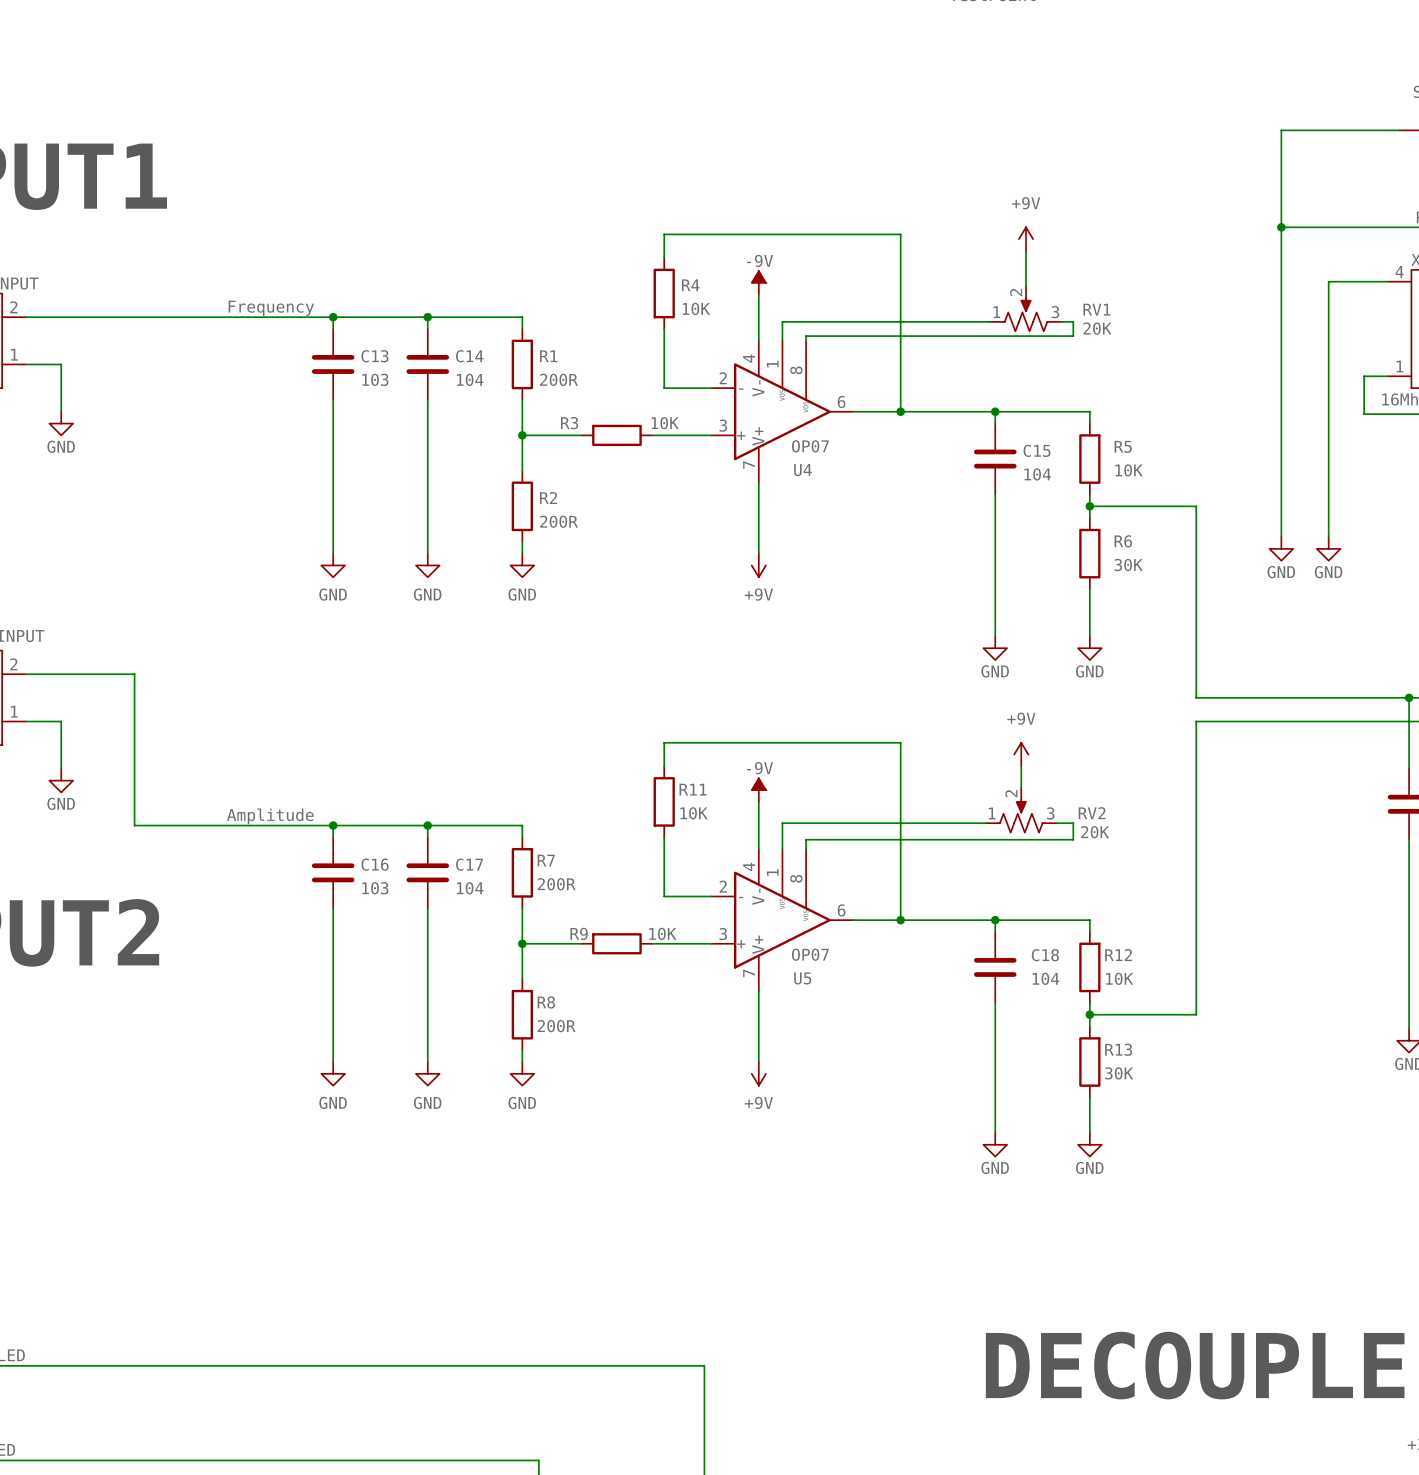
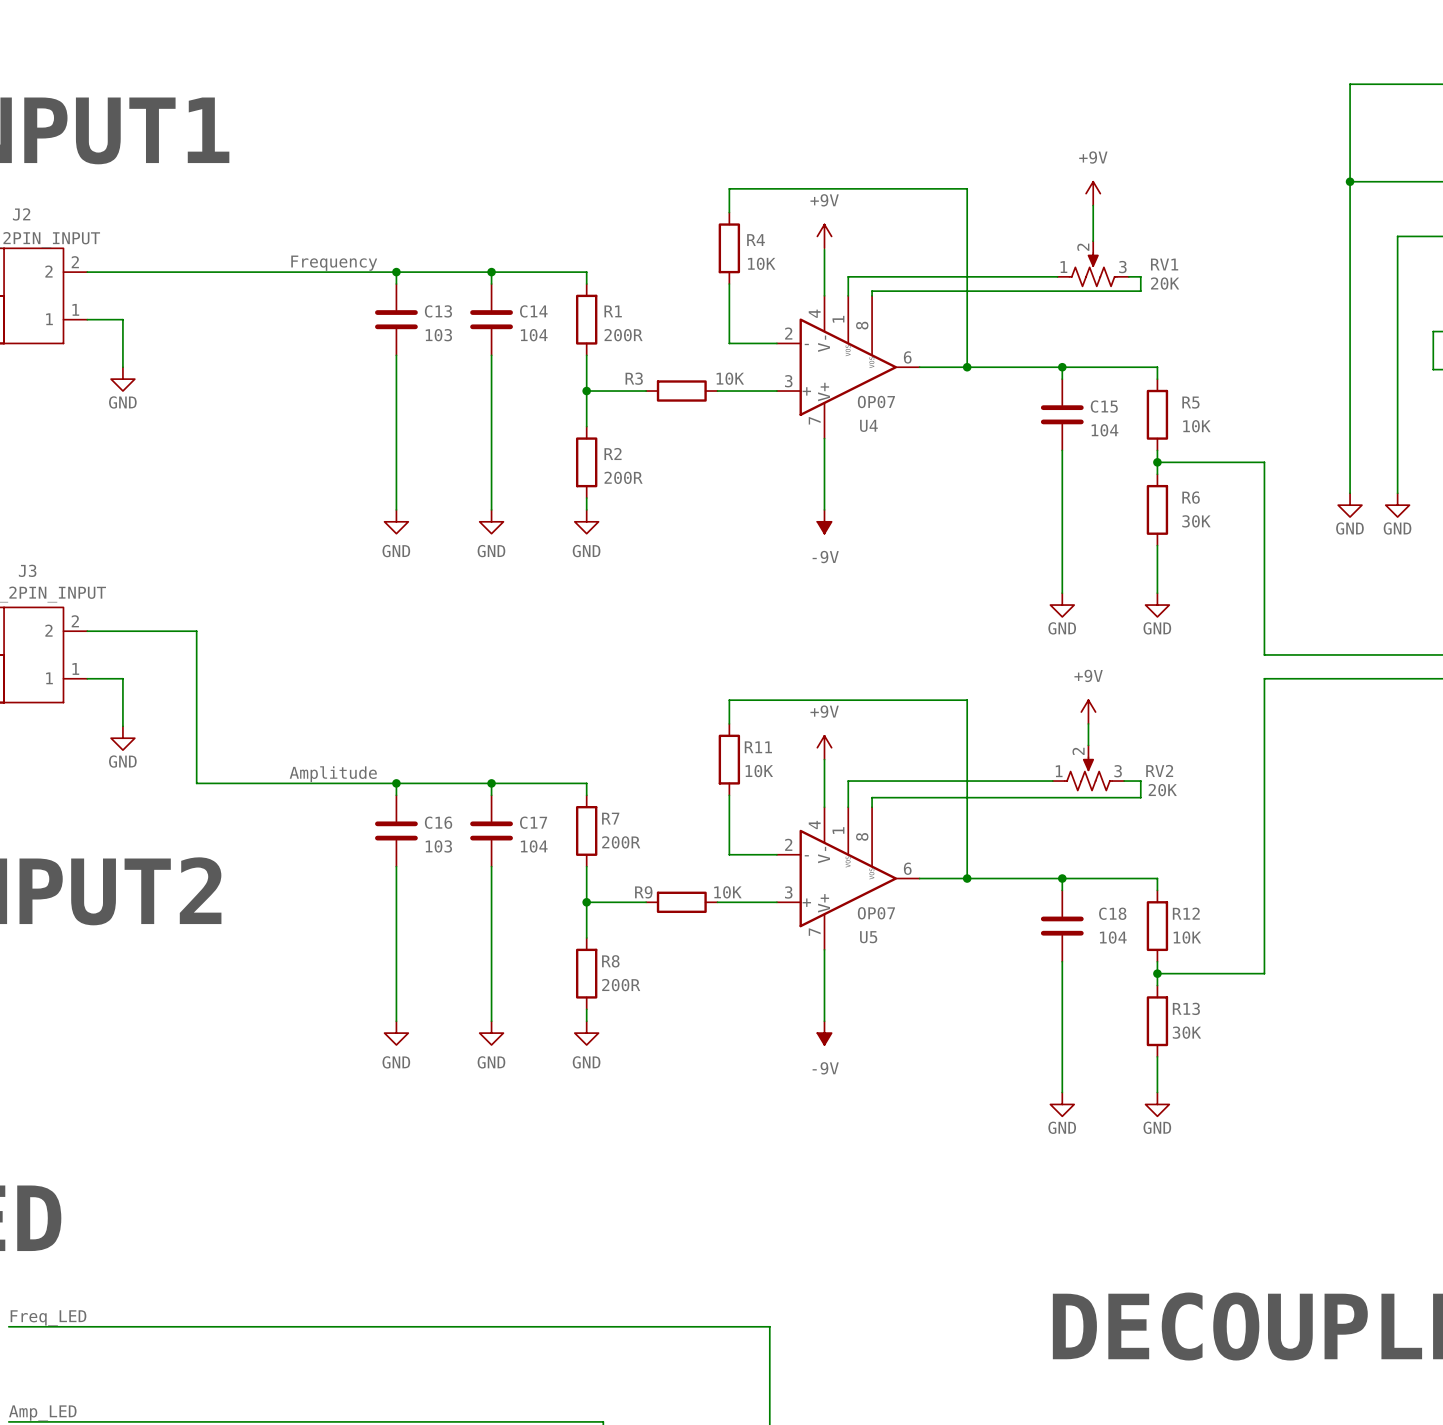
power symbol: -9V (758, 282) -> +9V (824, 236)
power symbol: +9V (758, 565) -> -9V (824, 521)
power symbol: -9V (758, 790) -> +9V (824, 747)
power symbol: +9V (758, 1073) -> -9V (824, 1033)

